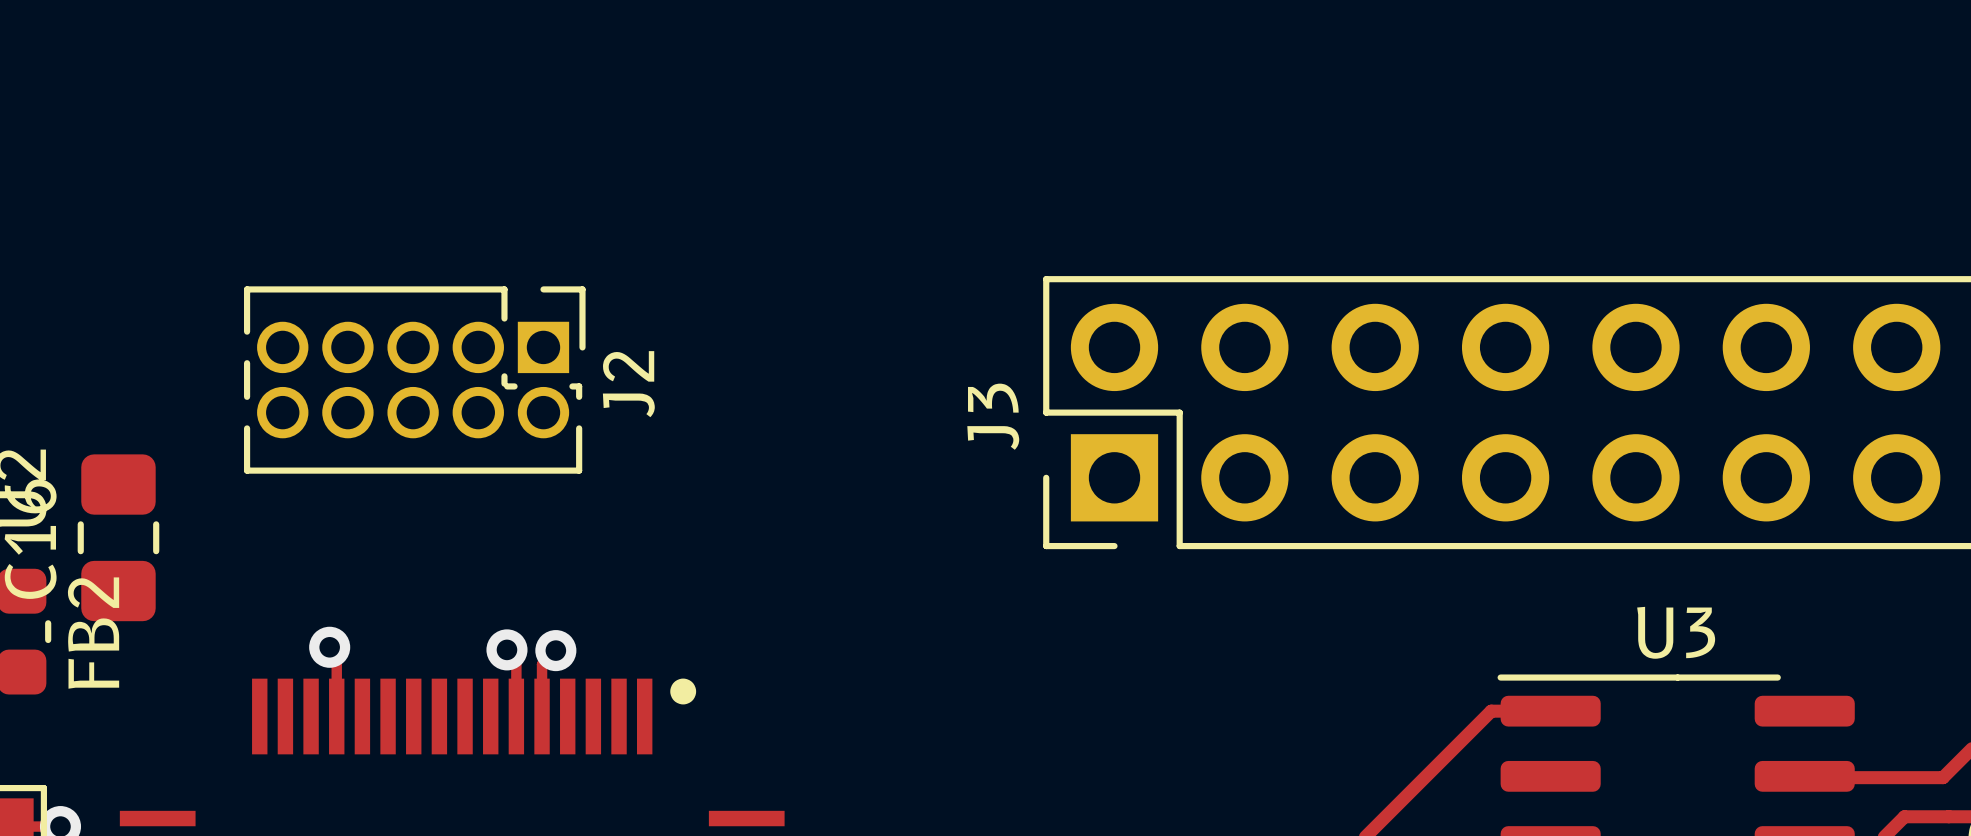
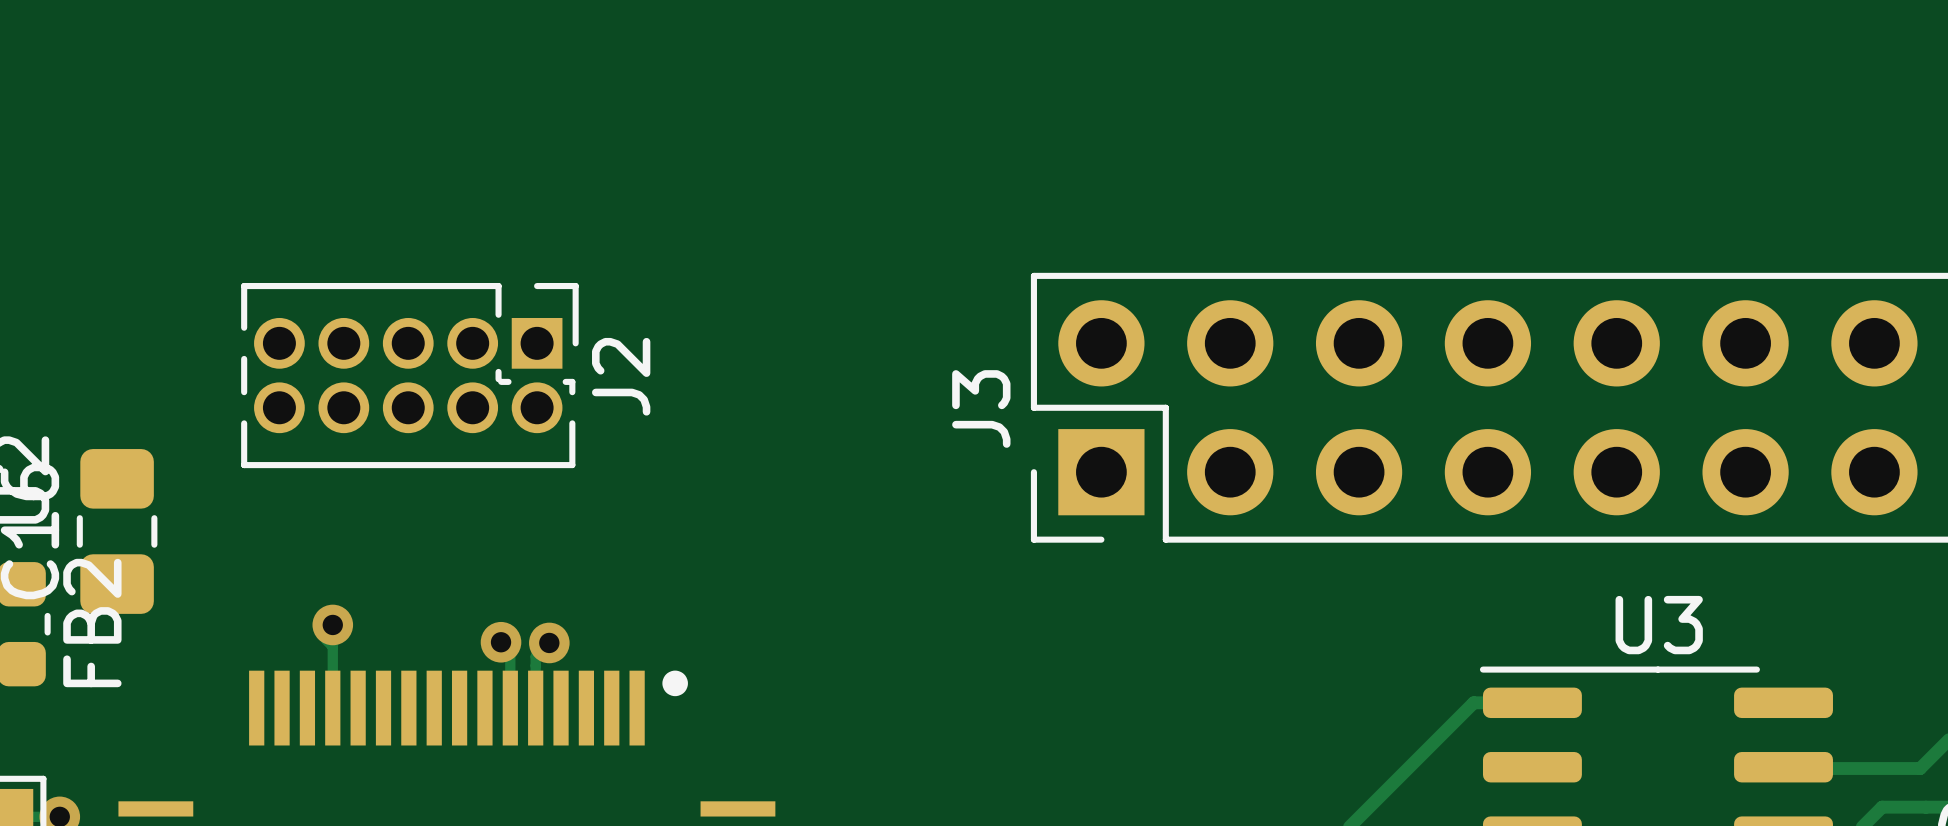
via position: (329, 647) -> (332, 624)

